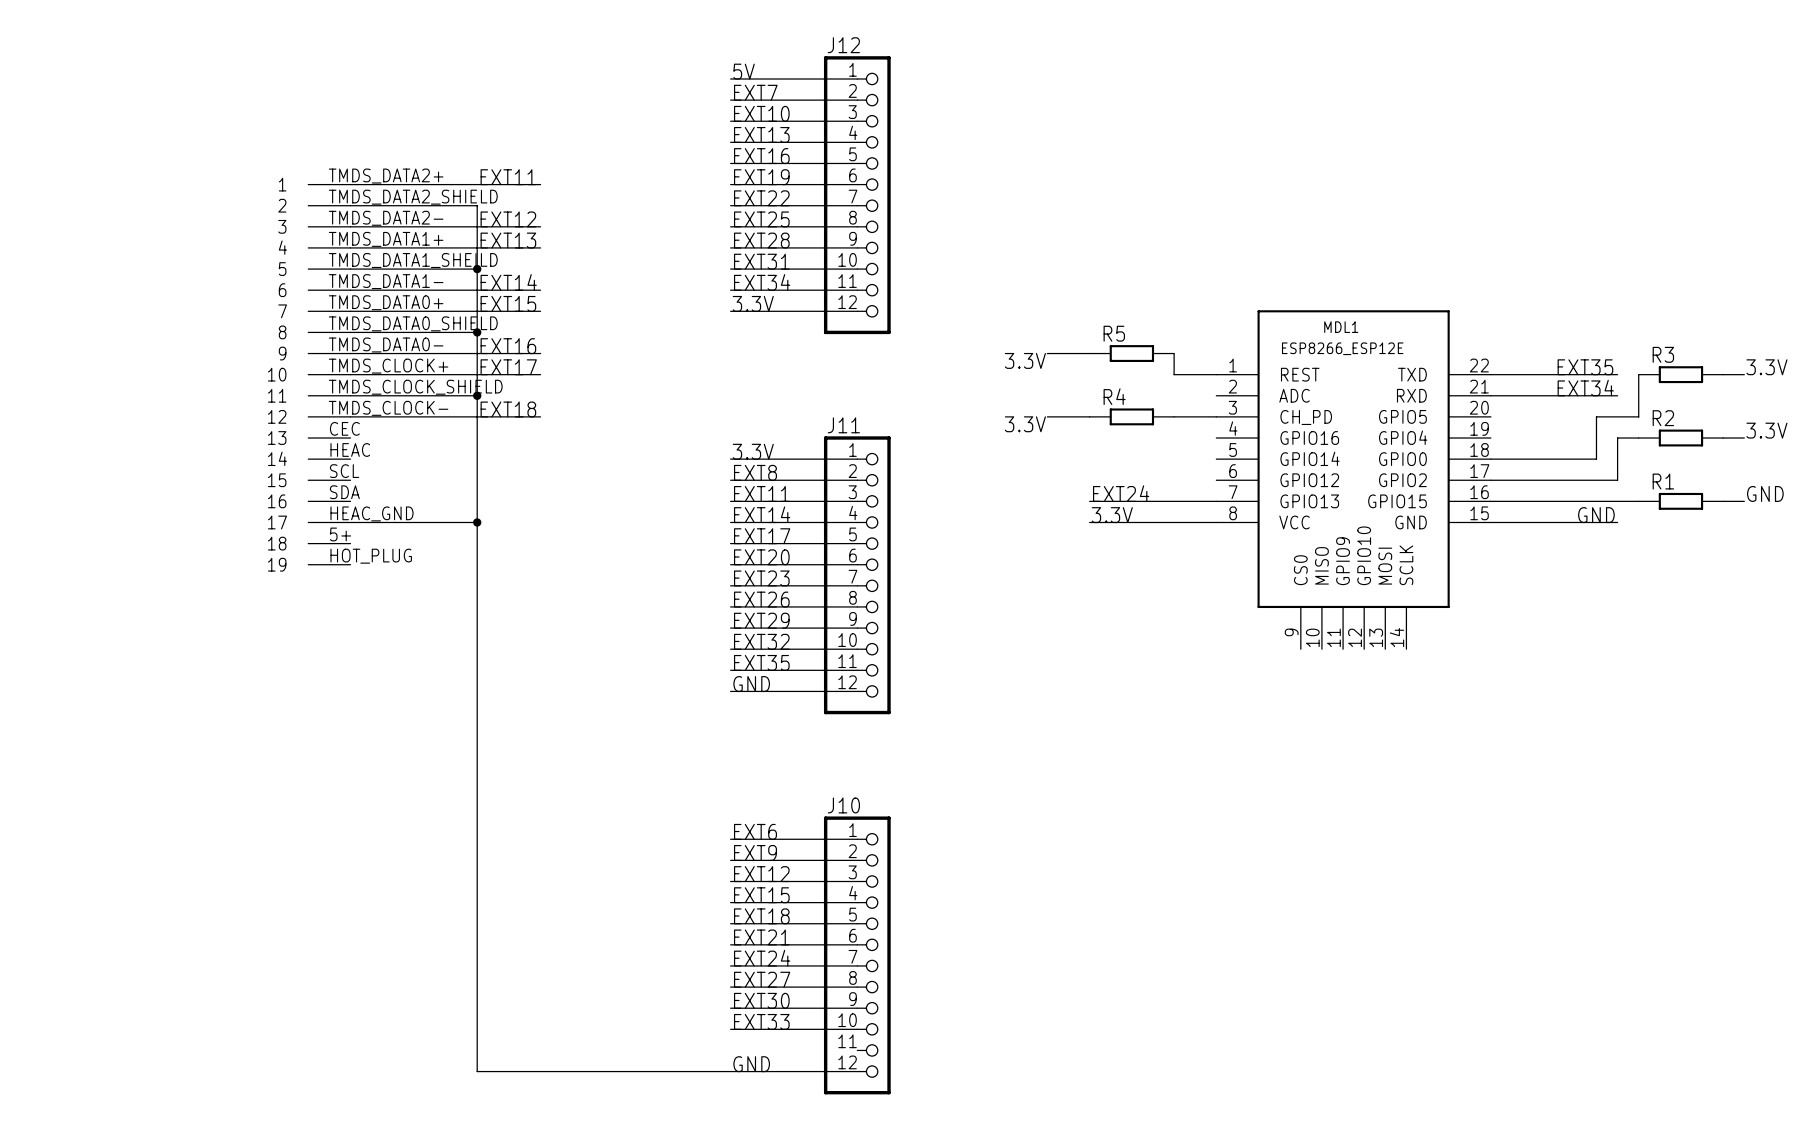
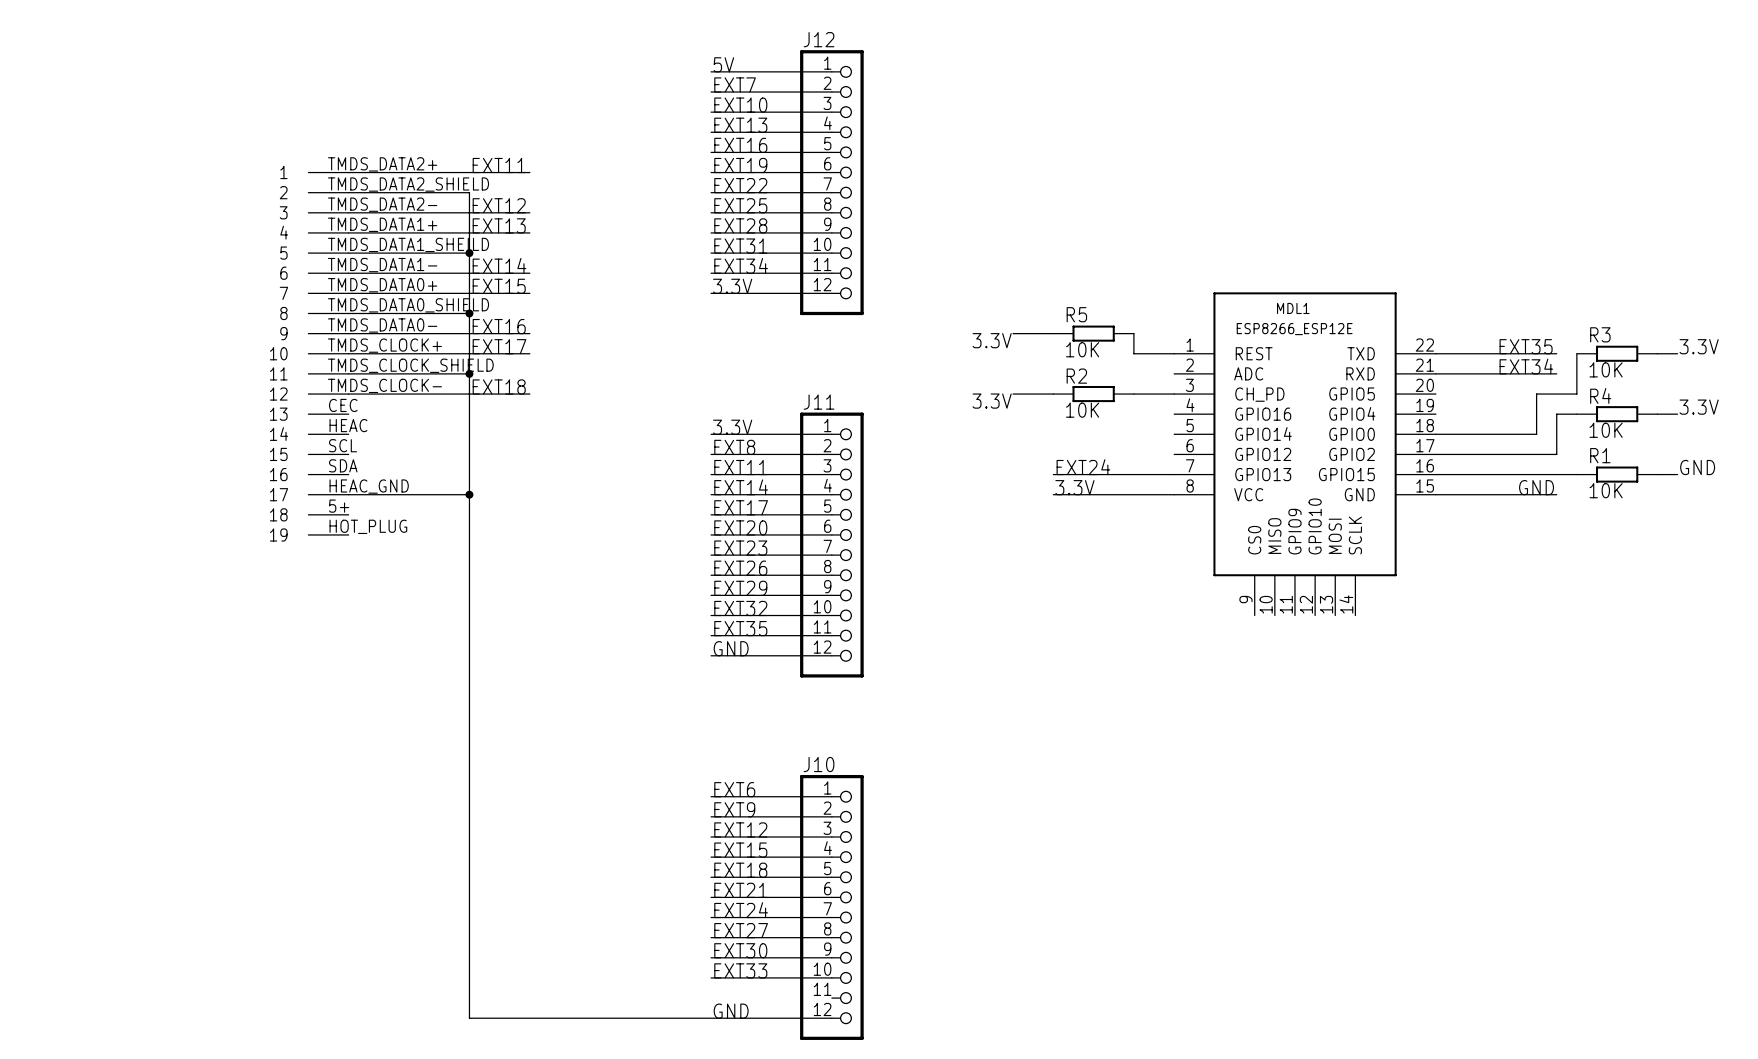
R5 value: none -> 10K (1082, 349)
R3 value: none -> 10K (1606, 369)
R4 name: R4 (1114, 396) -> R2 (1076, 376)
R2 name: R2 (1663, 418) -> R4 (1600, 395)
R4 value: none -> 10K (1082, 410)
R2 value: none -> 10K (1606, 430)
R1 value: none -> 10K (1606, 490)

